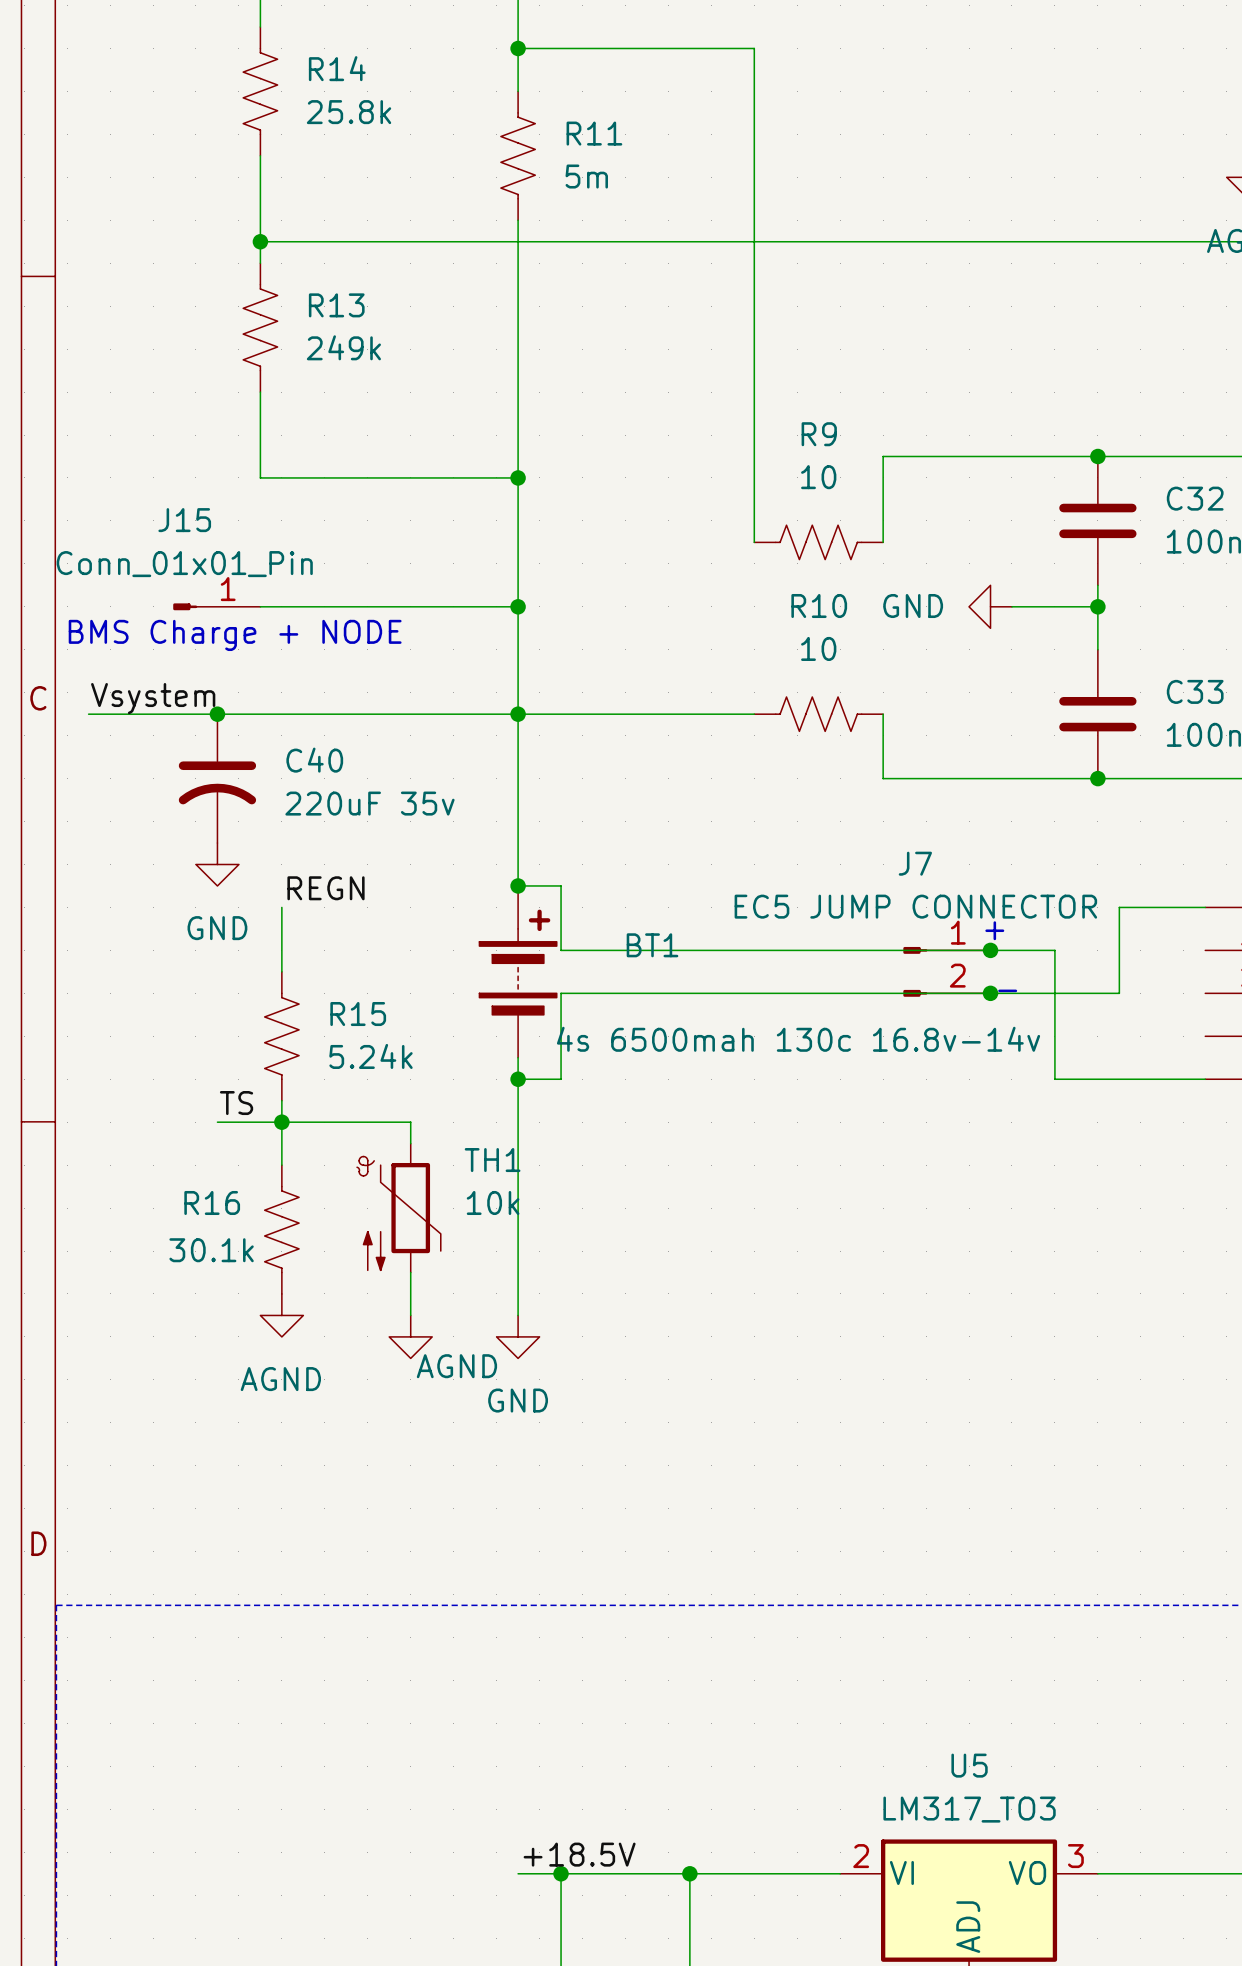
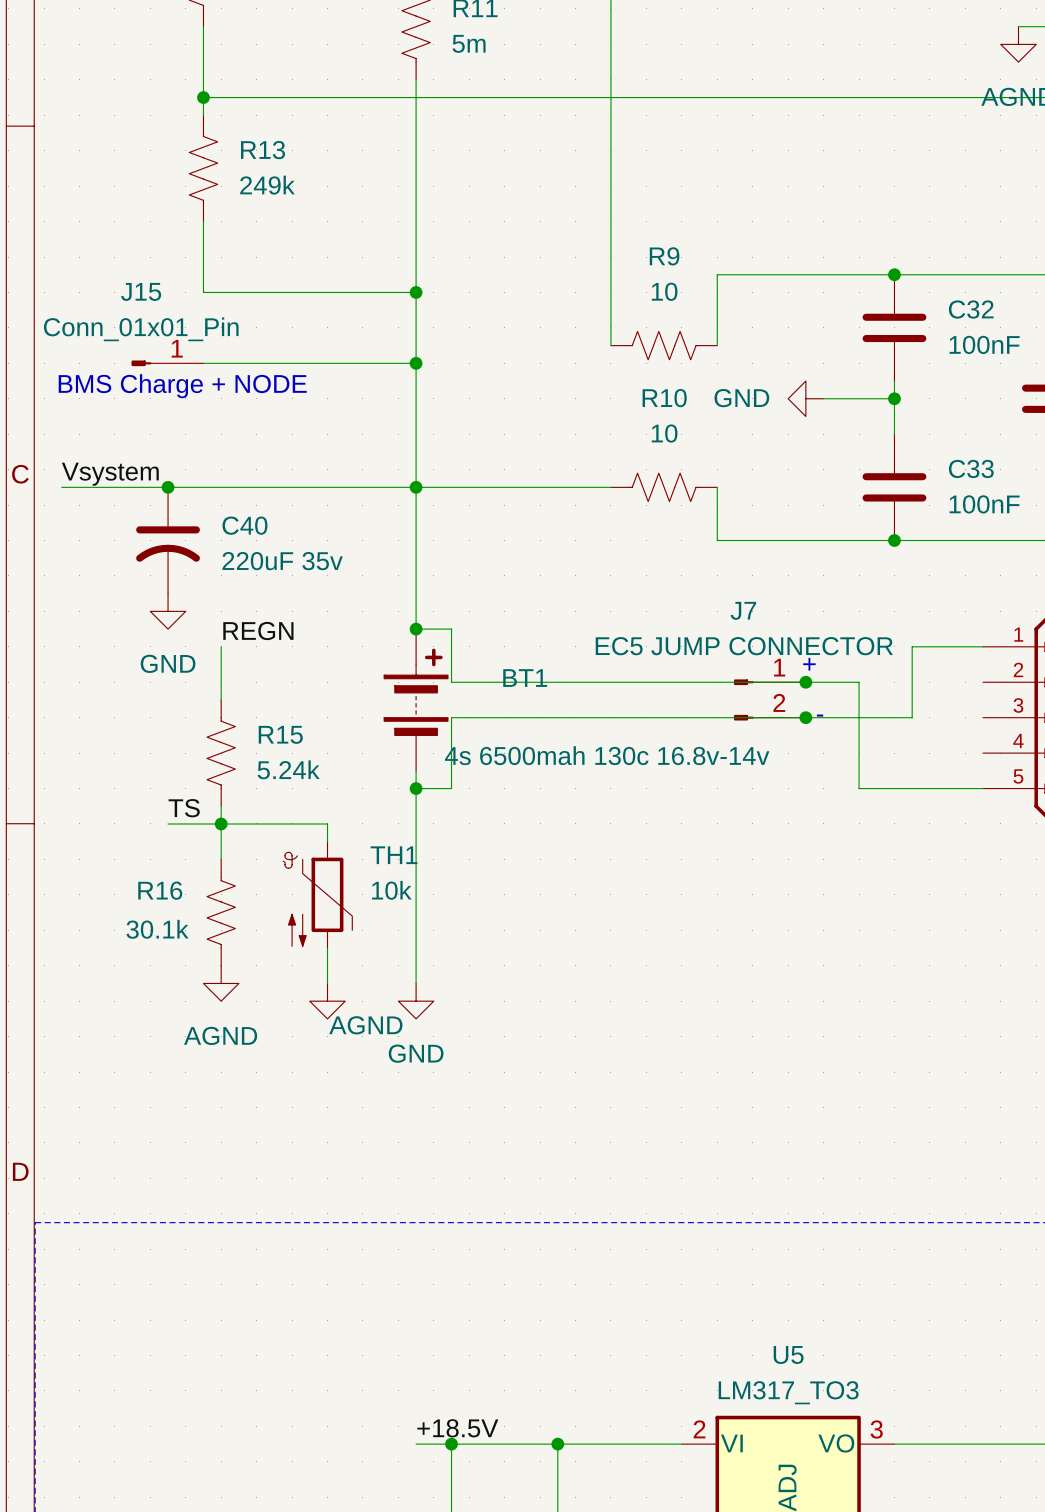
J15 position: (216, 606) -> (167, 363)
wire: (260, 606) (518, 606) -> (203, 363) (416, 363)
junction position: (518, 606) -> (416, 363)
text position: BMS Charge + NODE (235, 635) -> BMS Charge + NODE (182, 386)

